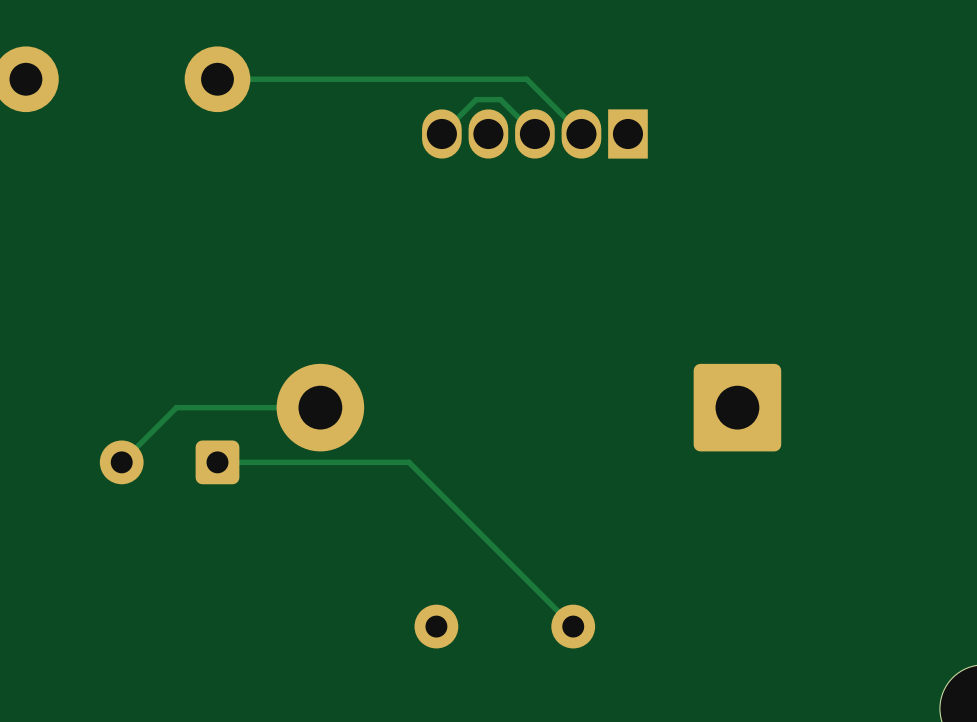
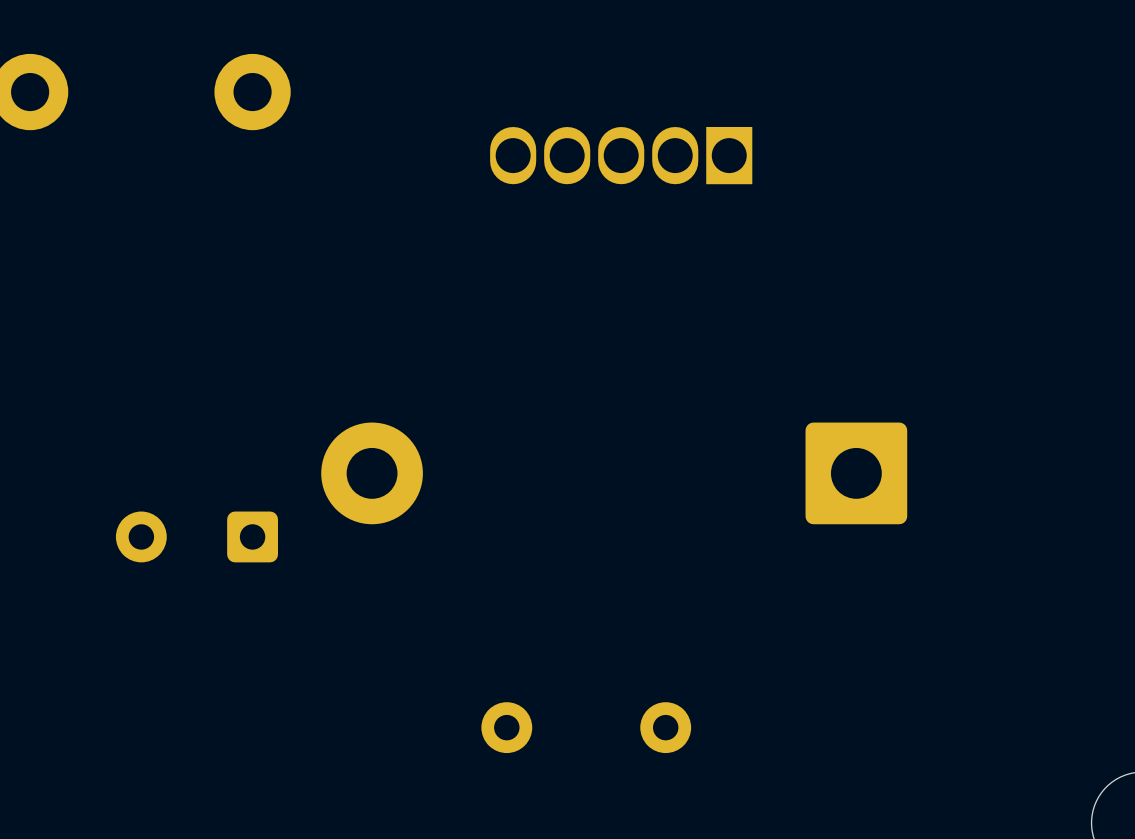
track: (217, 79) (526, 79) (581, 133) -> none
track: (534, 133) (500, 99) (476, 99) (441, 133) -> none
track: (320, 407) (176, 407) (121, 462) -> none
track: (217, 462) (409, 462) (573, 626) -> none

